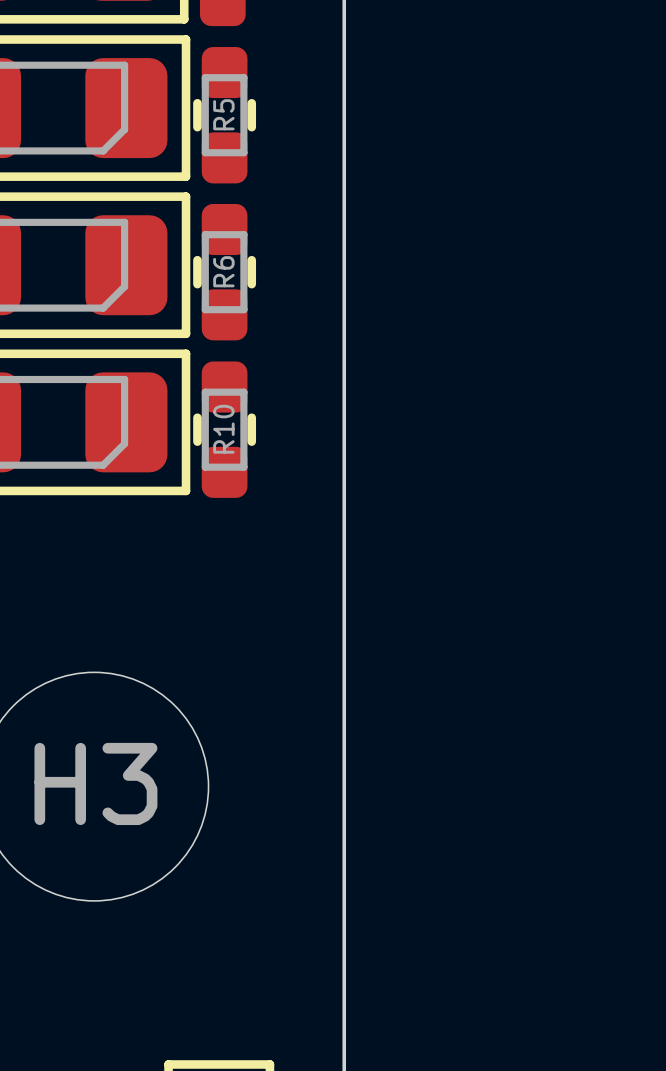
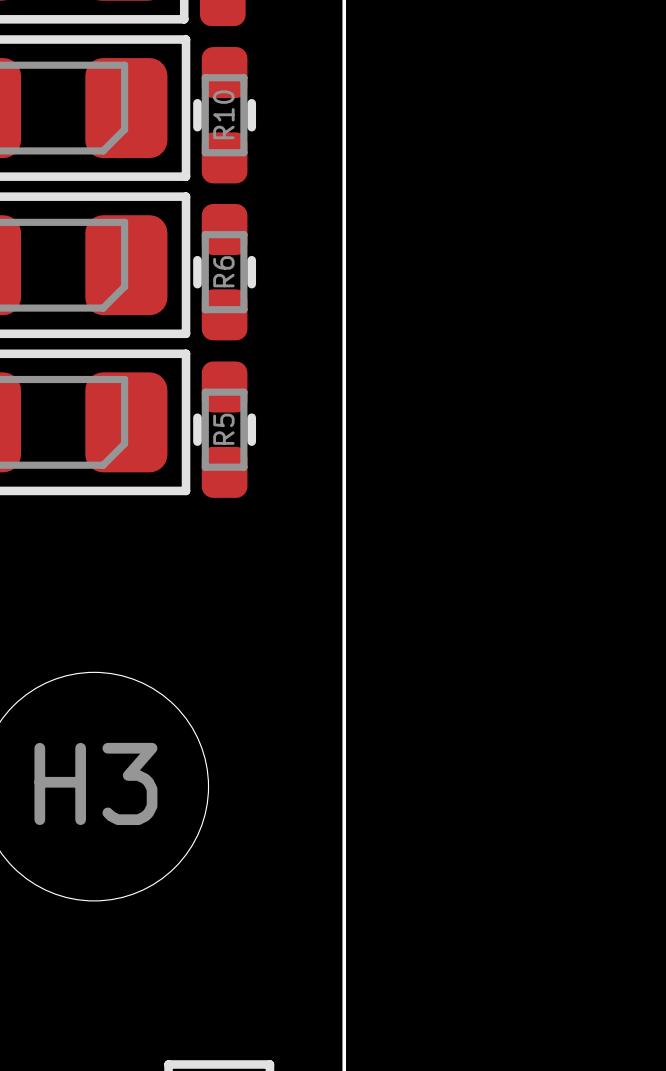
R5 name: R5 (223, 114) -> R10 (223, 114)
R10 name: R10 (223, 429) -> R5 (223, 429)

